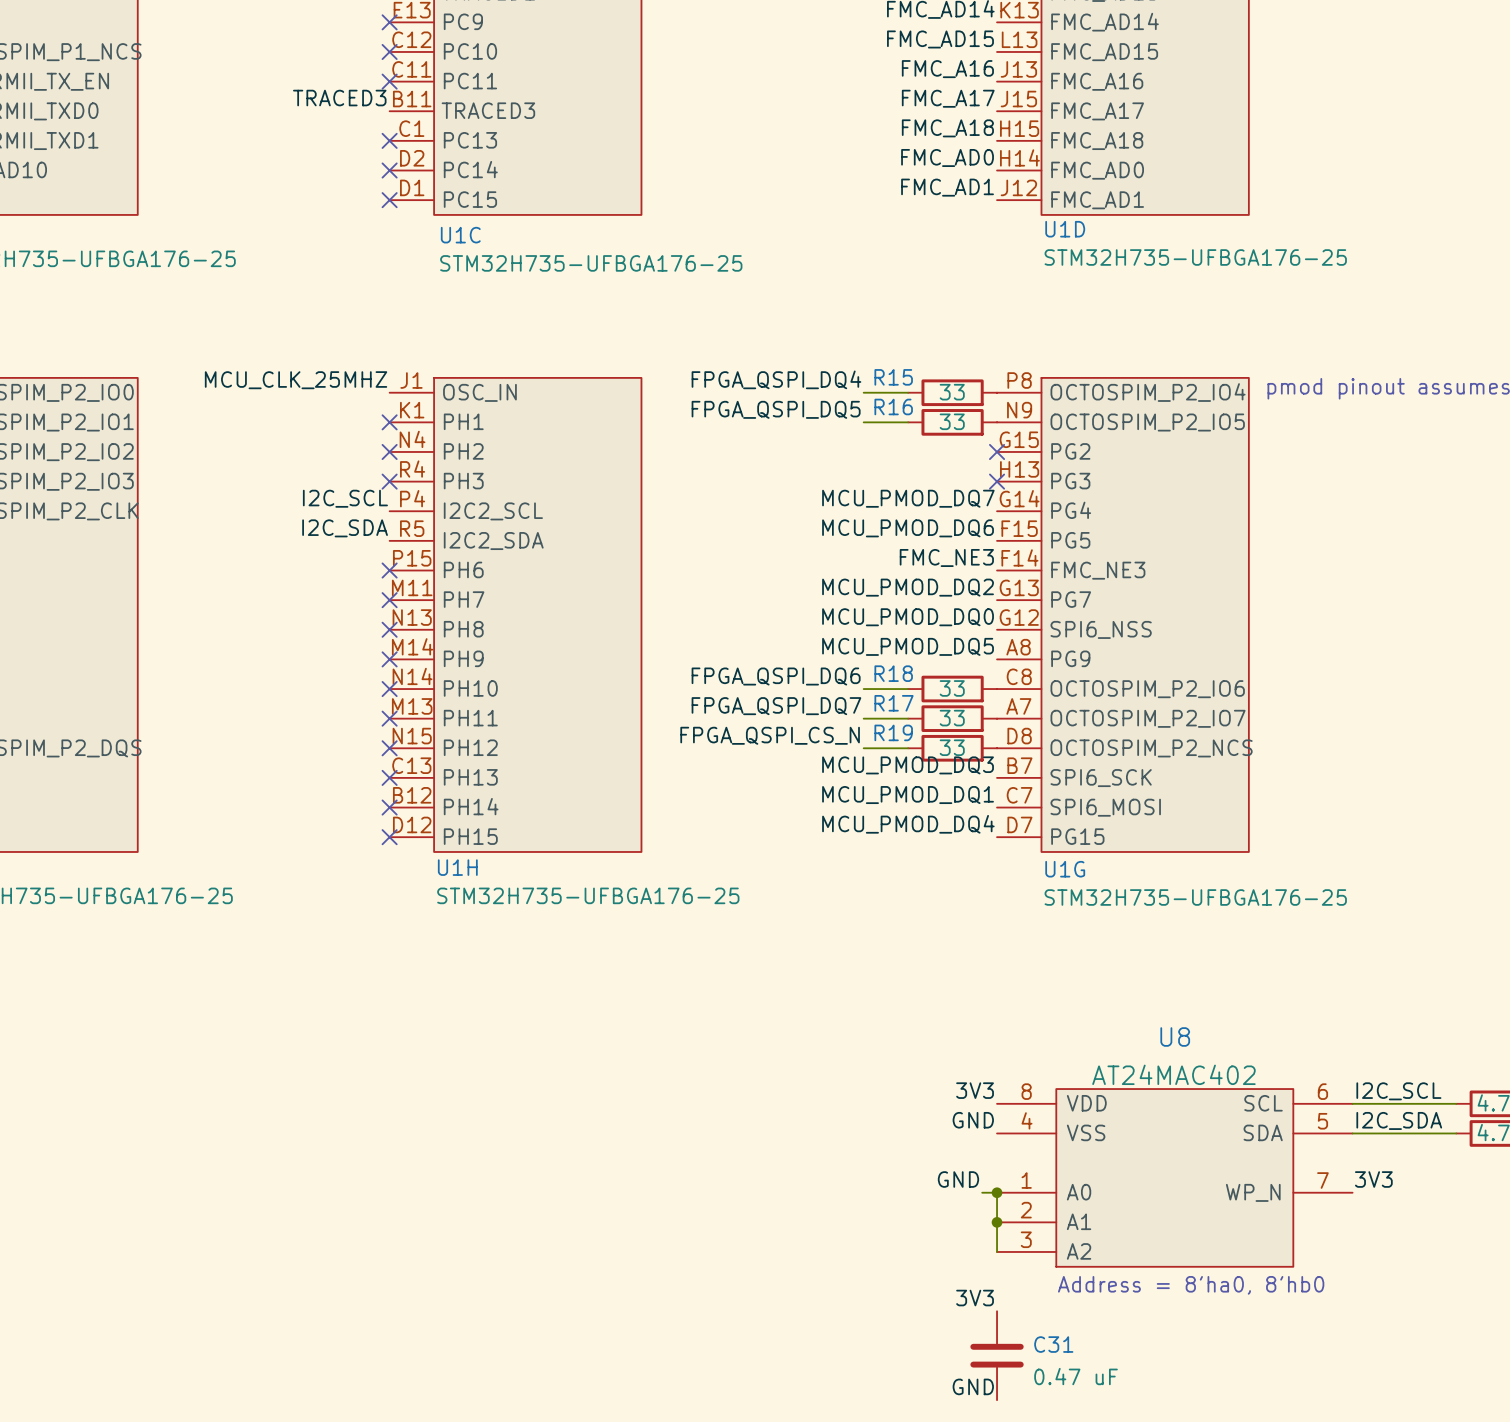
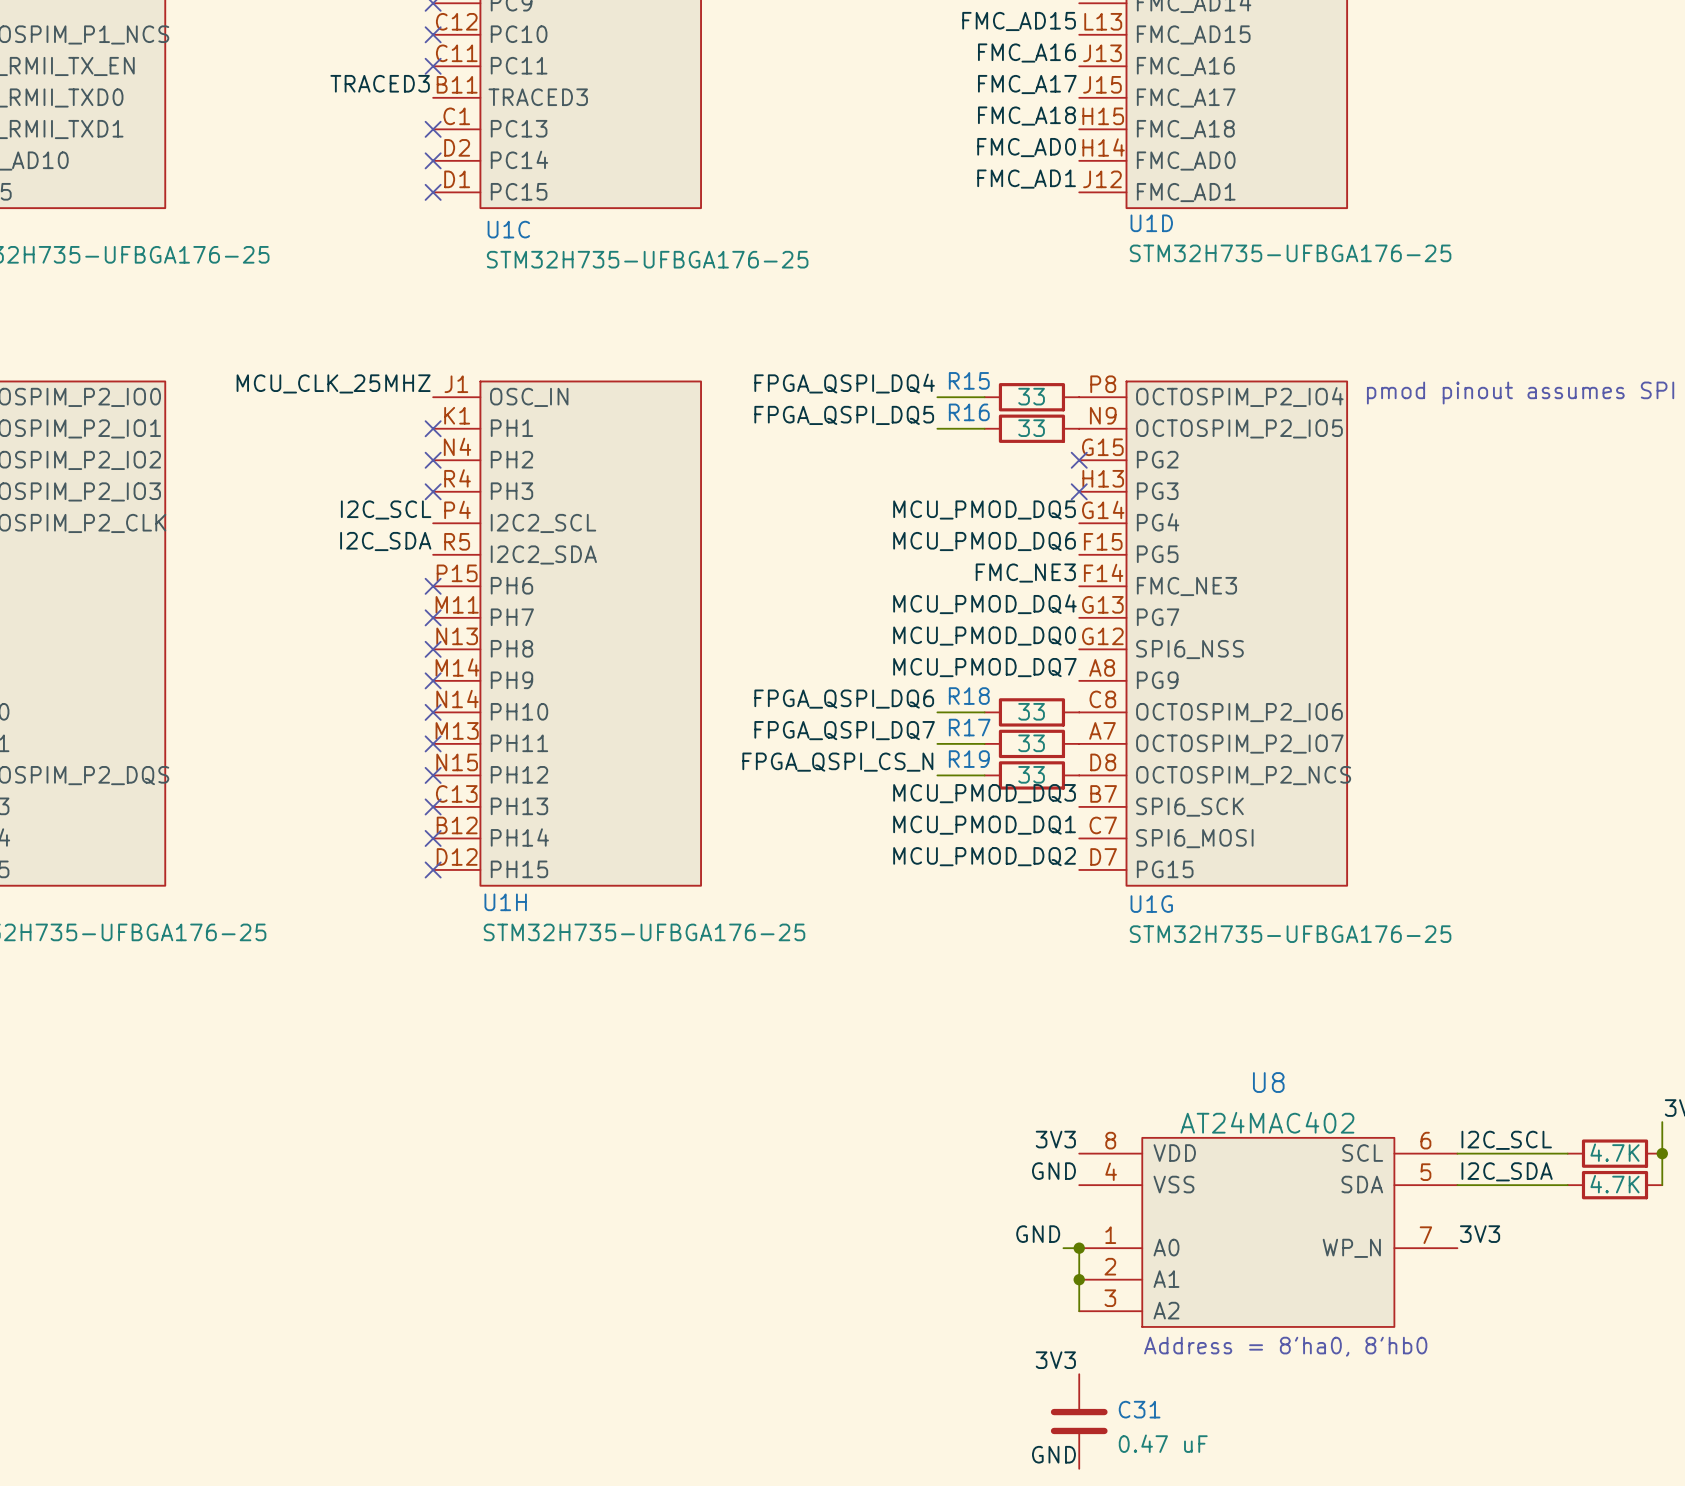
label: MCU_PMOD_DQ7 (908, 498) -> MCU_PMOD_DQ5 (984, 509)
label: MCU_PMOD_DQ2 (908, 587) -> MCU_PMOD_DQ4 (984, 604)
label: MCU_PMOD_DQ5 (908, 646) -> MCU_PMOD_DQ7 (984, 667)
label: MCU_PMOD_DQ4 (908, 824) -> MCU_PMOD_DQ2 (984, 856)

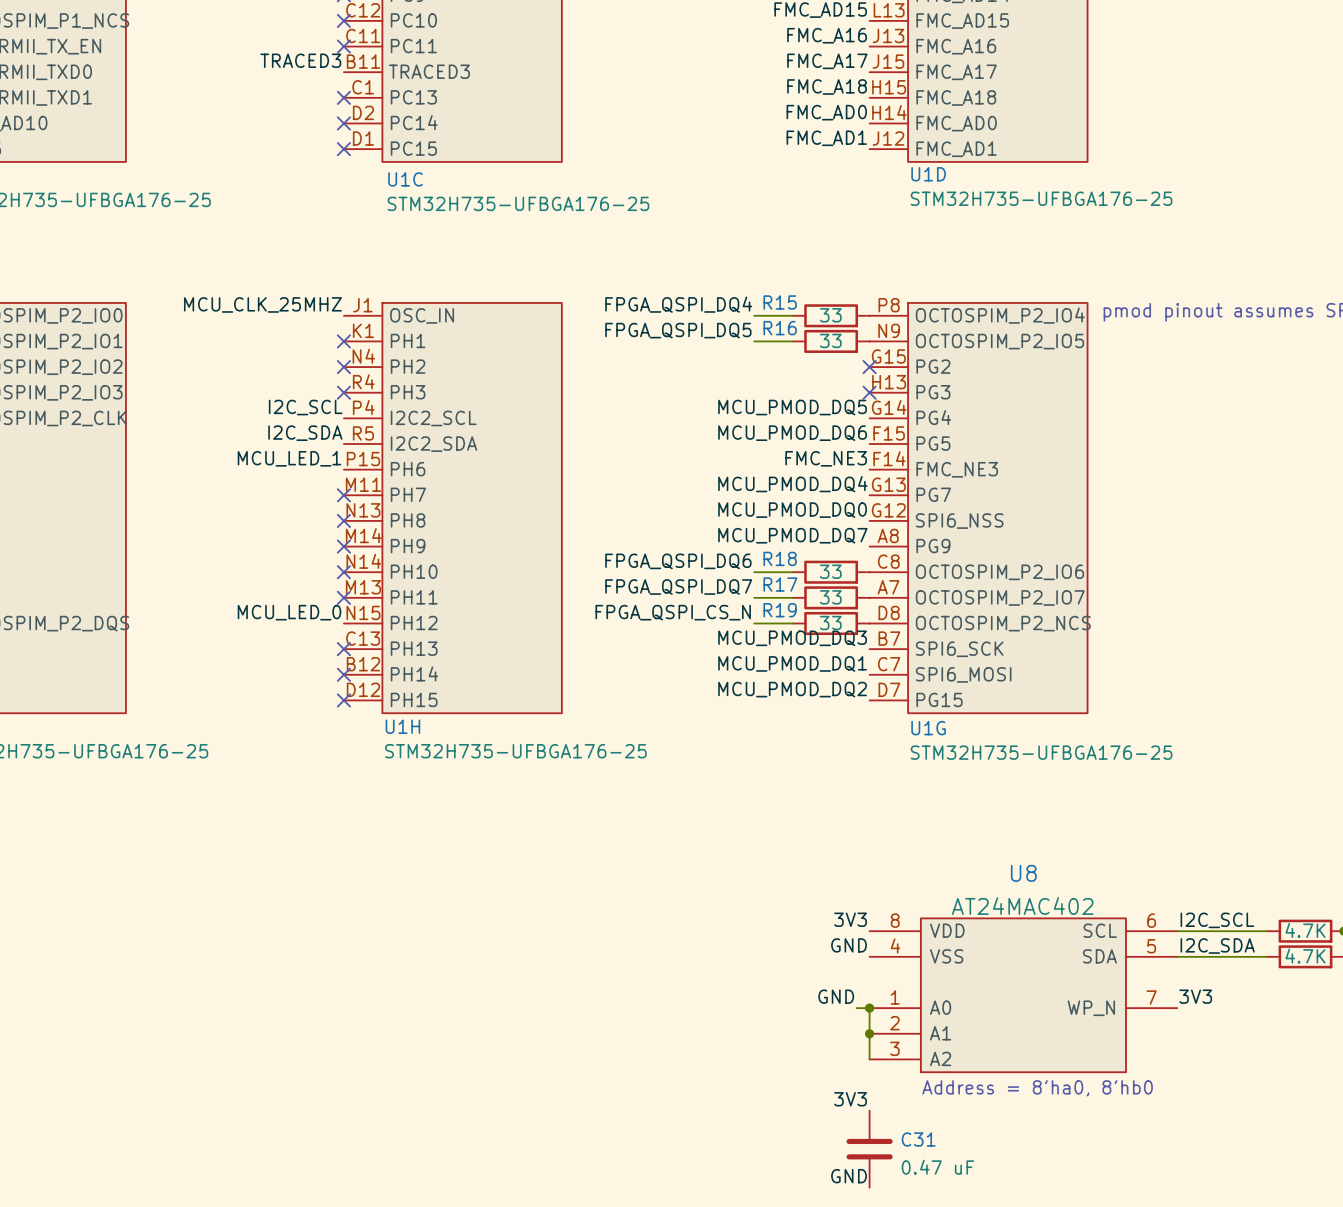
label: none -> MCU_LED_1 (289, 458)
no-connect mark: (433, 586) -> none
label: none -> MCU_LED_0 (289, 612)
no-connect mark: (433, 775) -> none

